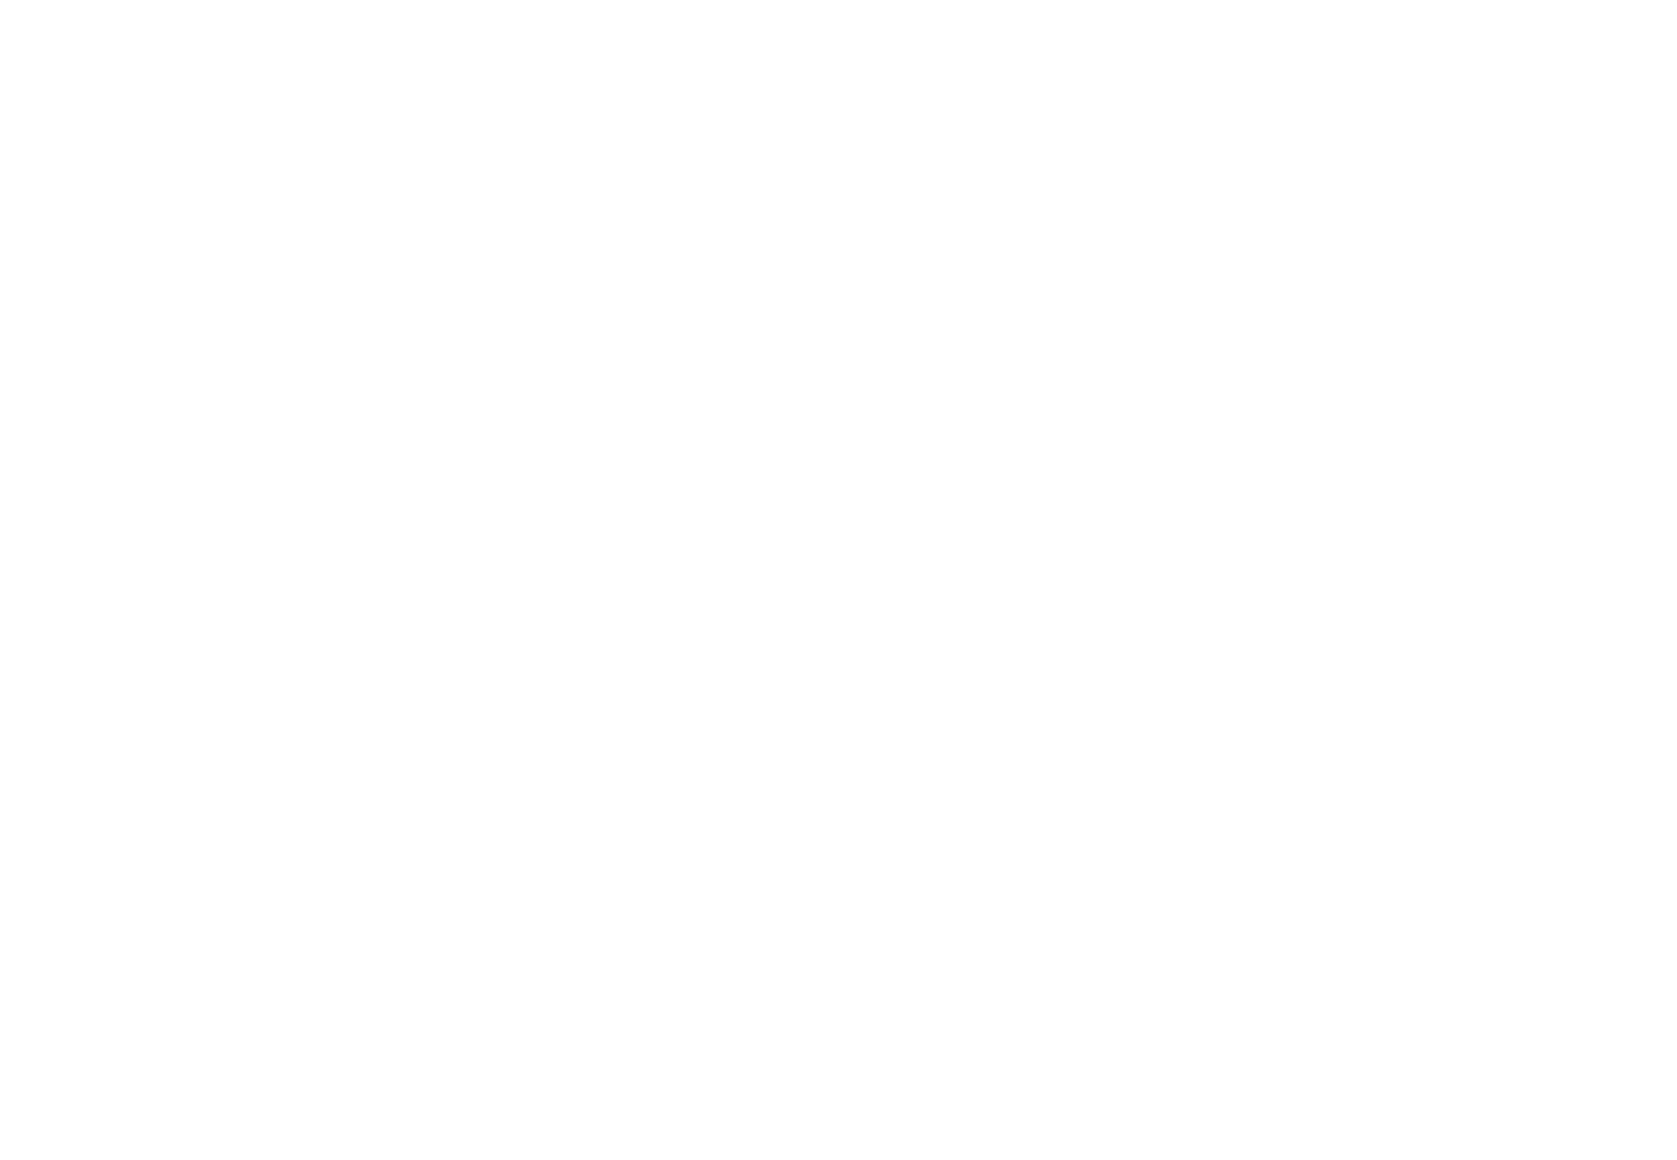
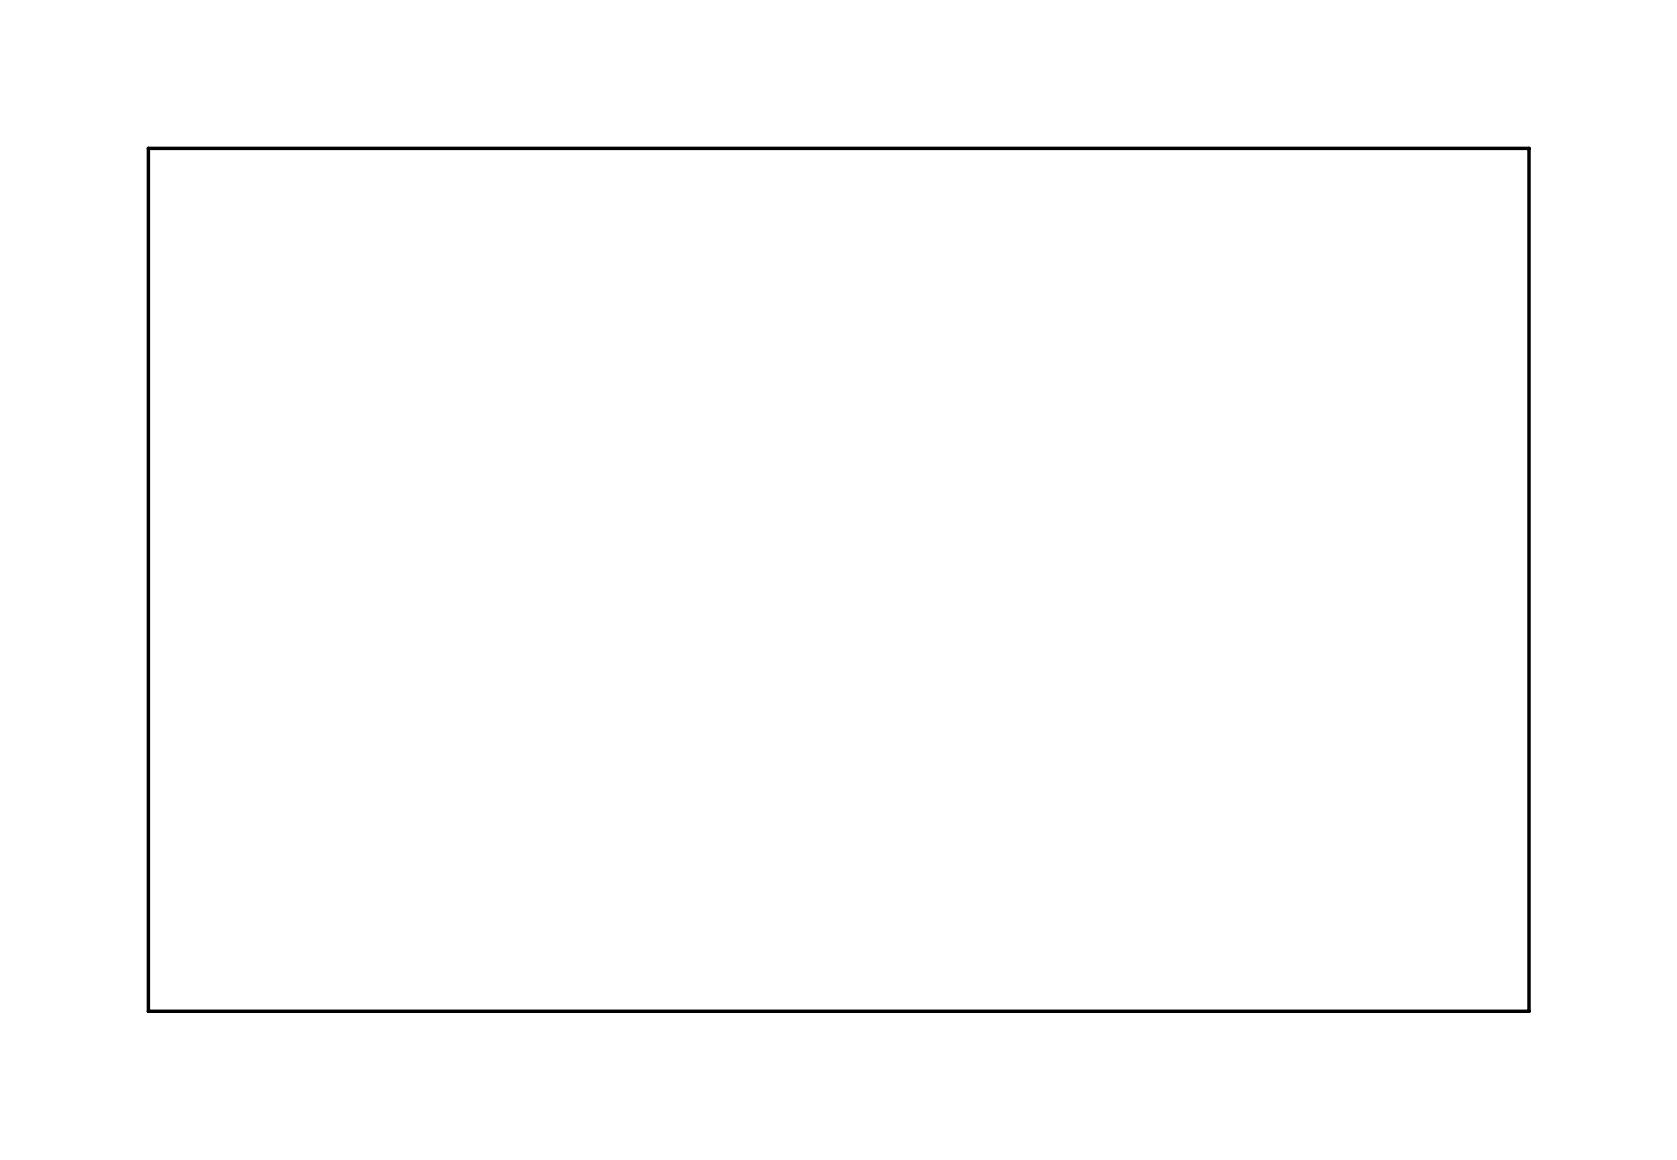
board edge: none -> (1529, 148) (148, 148) (148, 1011) (1529, 1011) (1529, 148)

